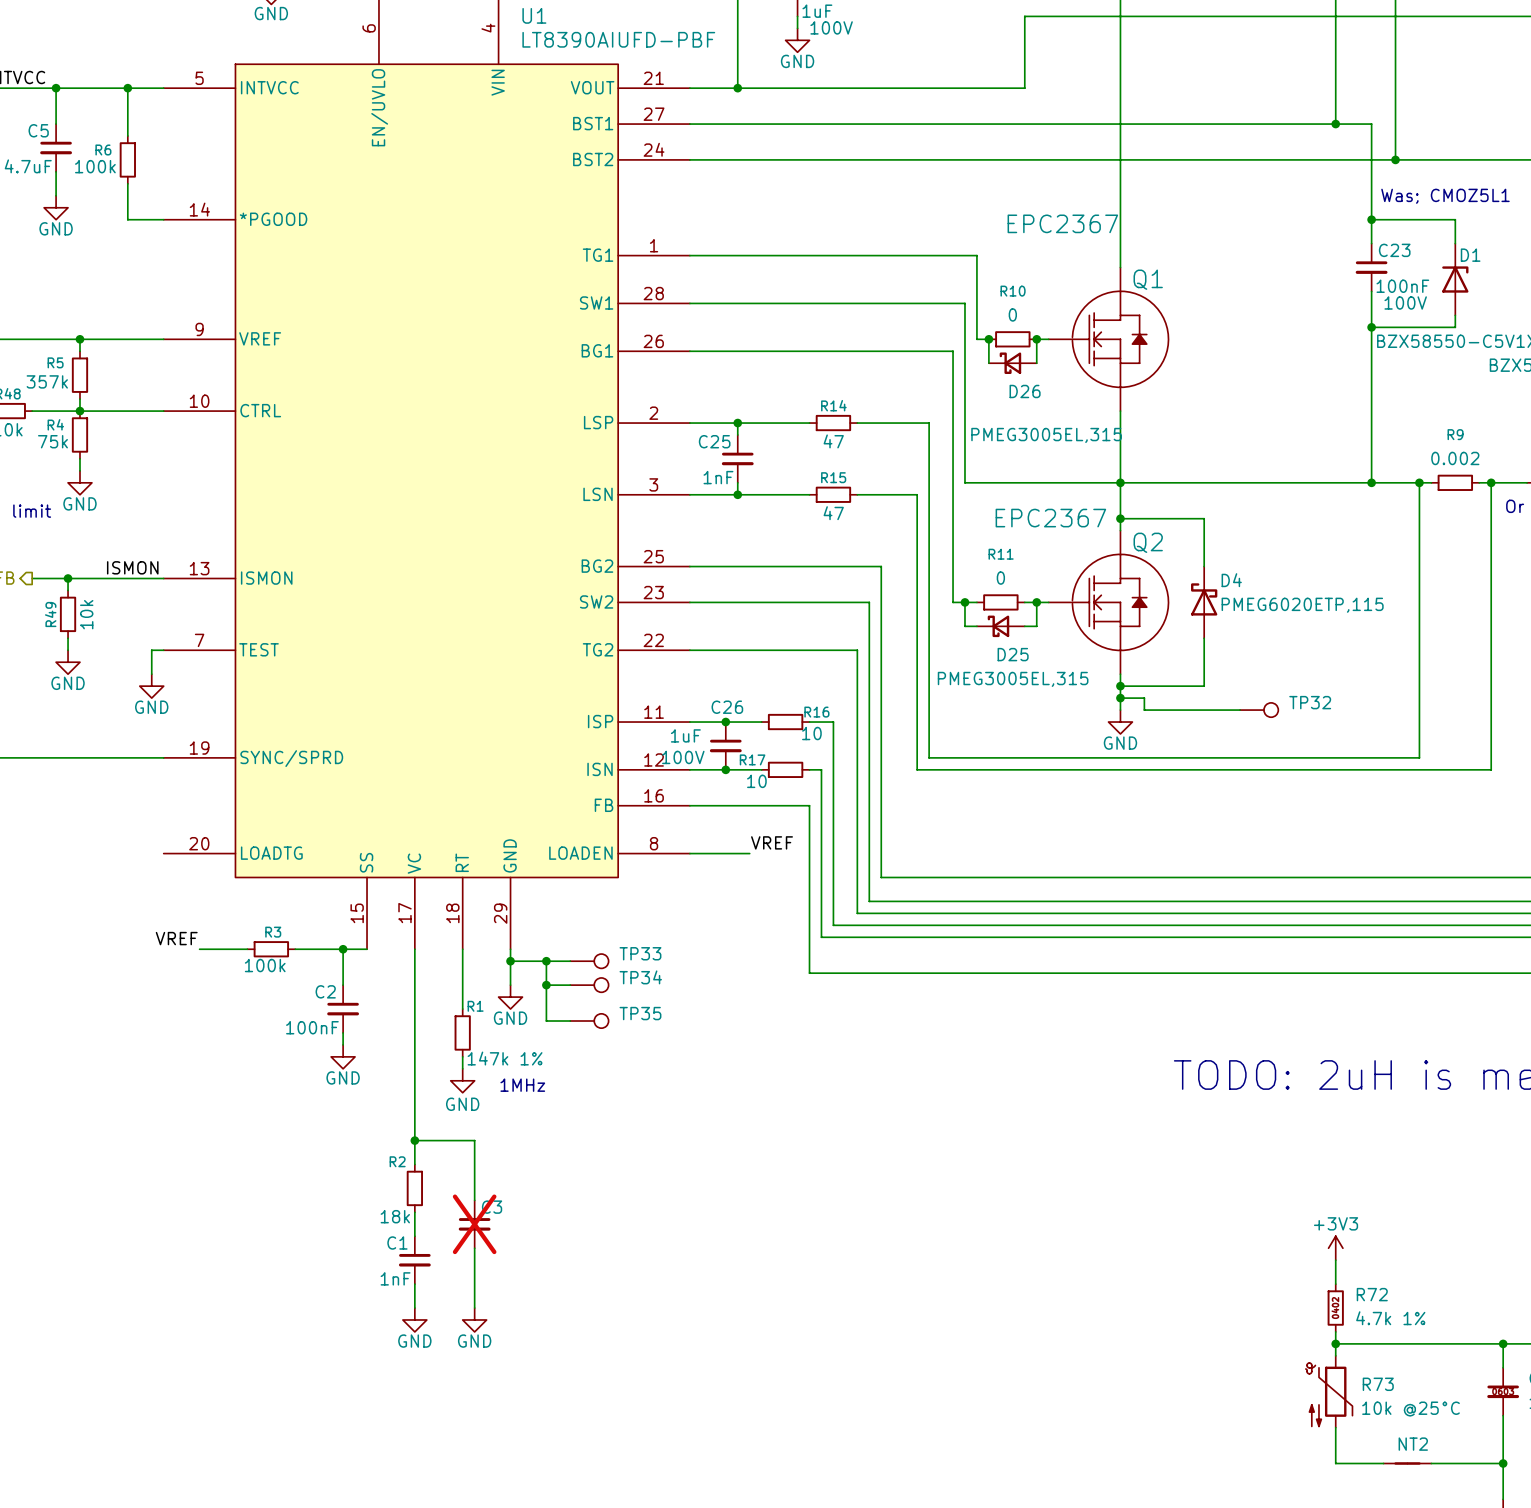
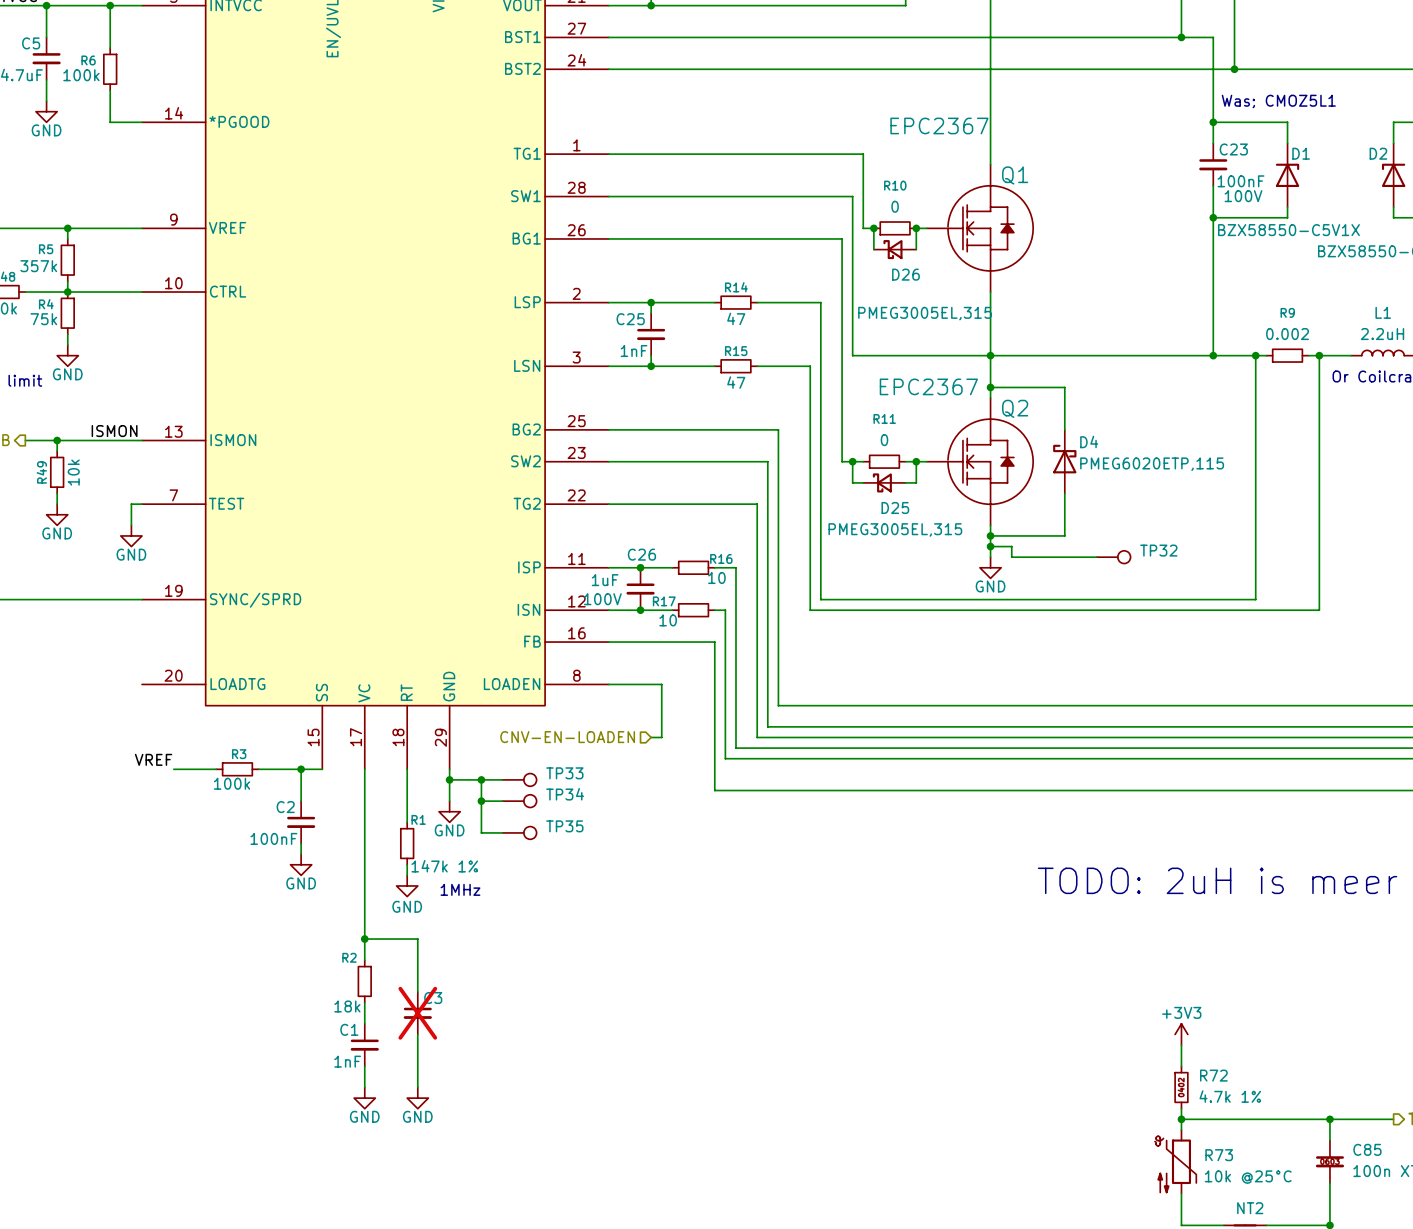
label: VREF (772, 842) -> none
wire: none -> (661, 684) (661, 737) (651, 737)
hierarchical label: none -> CNV-EN-LOADEN (567, 737)

